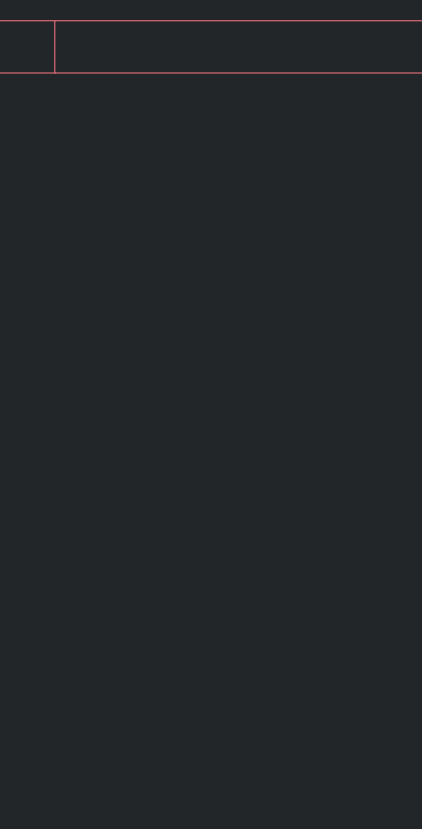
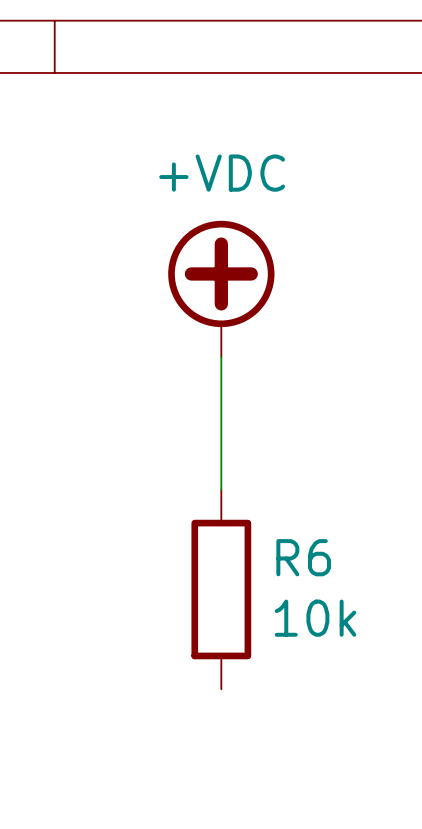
power symbol: none -> +VDC (221, 288)
wire: none -> (221, 357) (221, 489)
R6: none -> 10k (221, 589)

